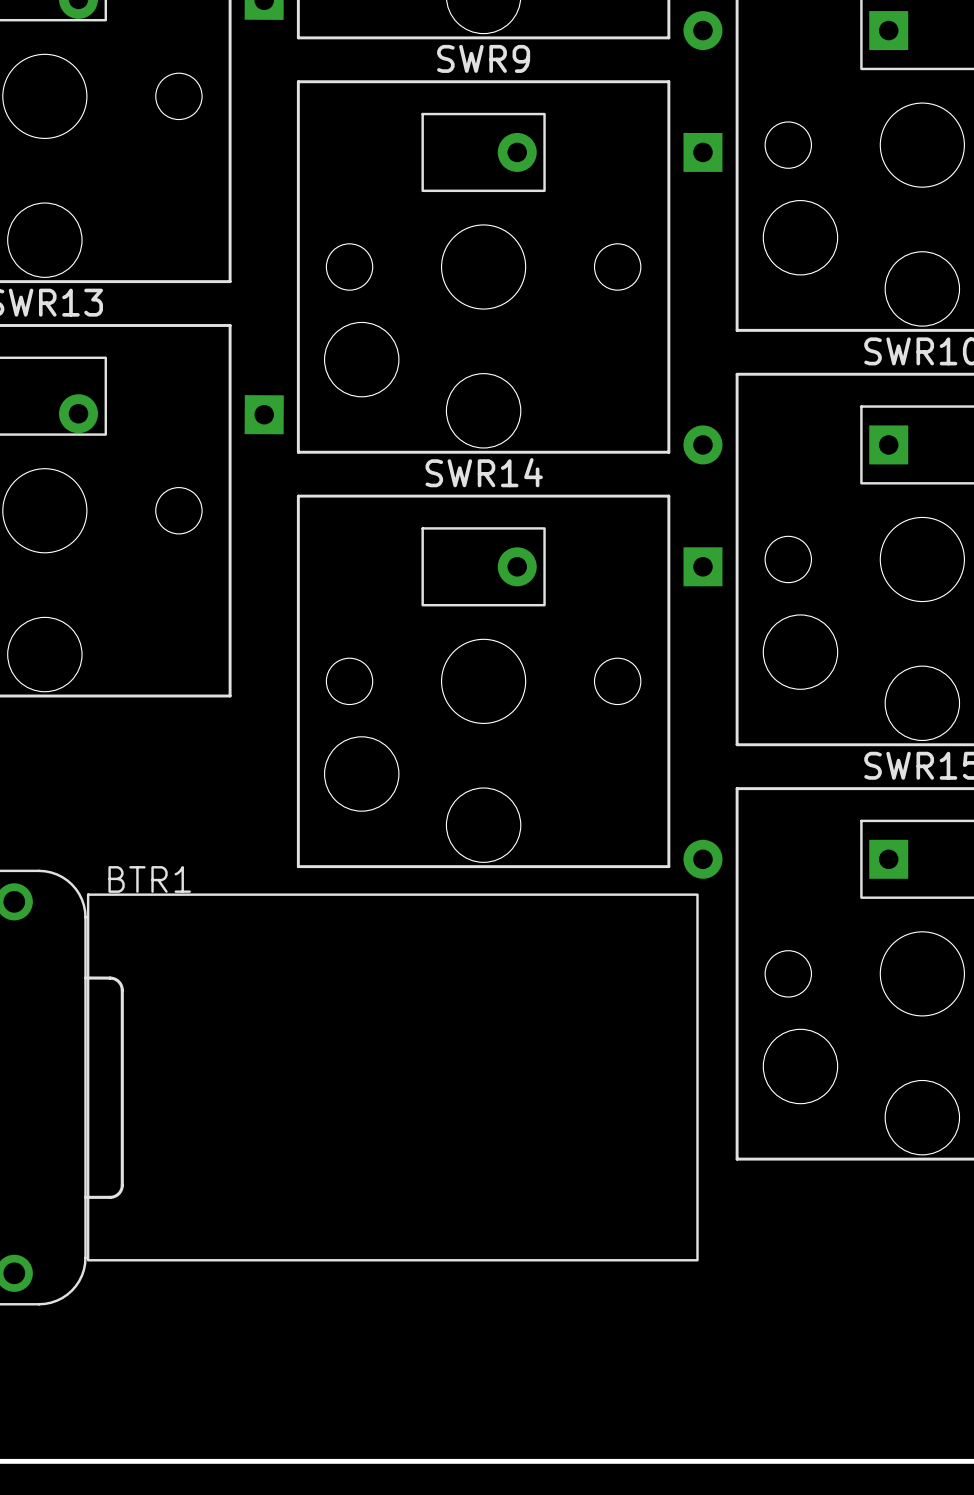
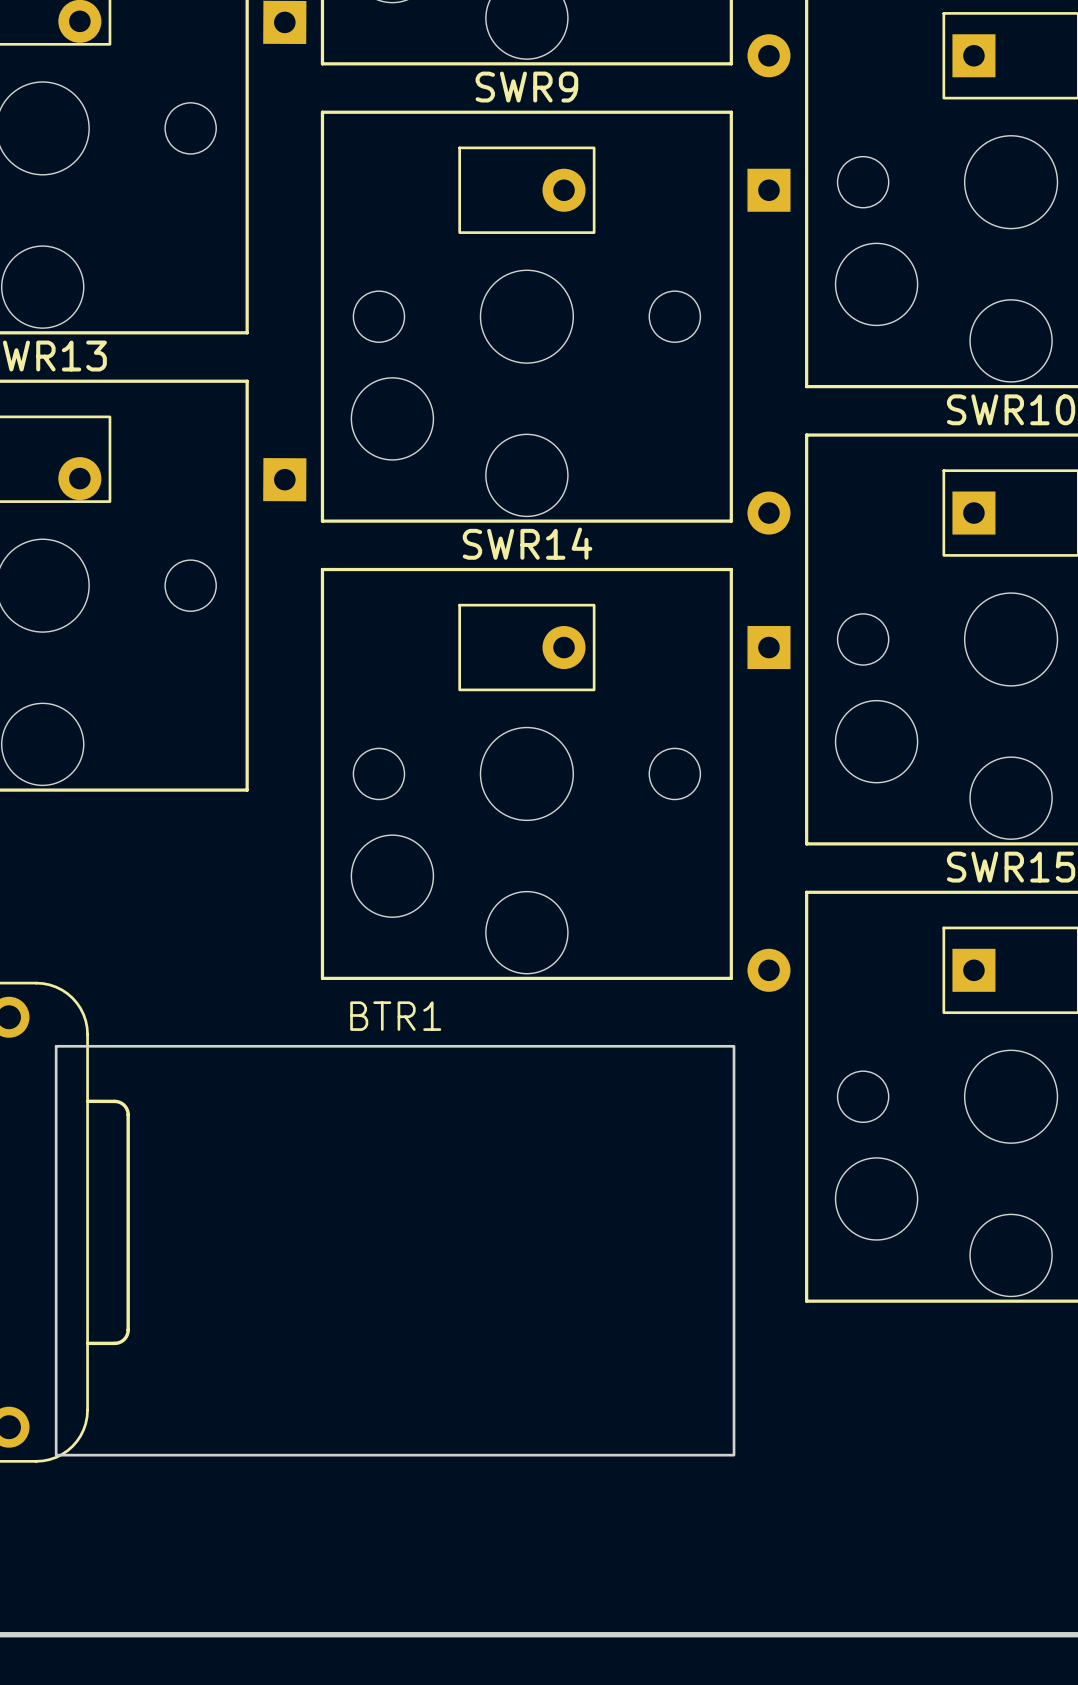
BTR1 name position: BTR1 (149, 879) -> BTR1 (395, 1016)
BTR1 footprint: [86, 893, 699, 1262] -> [54, 1044, 736, 1457]

